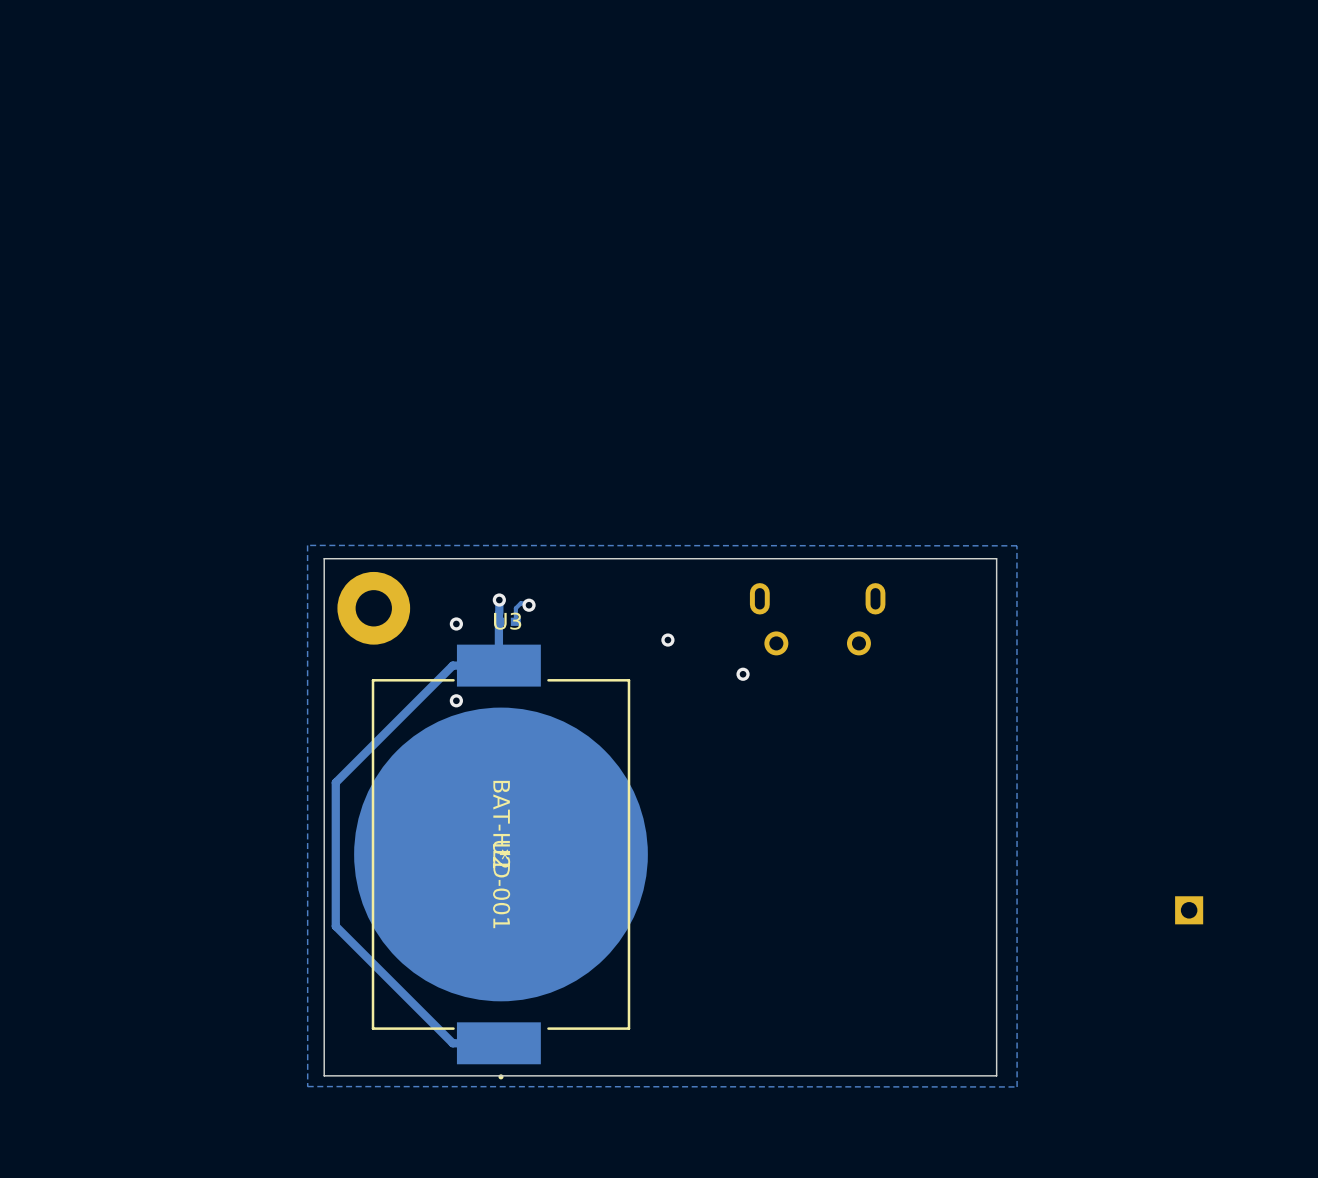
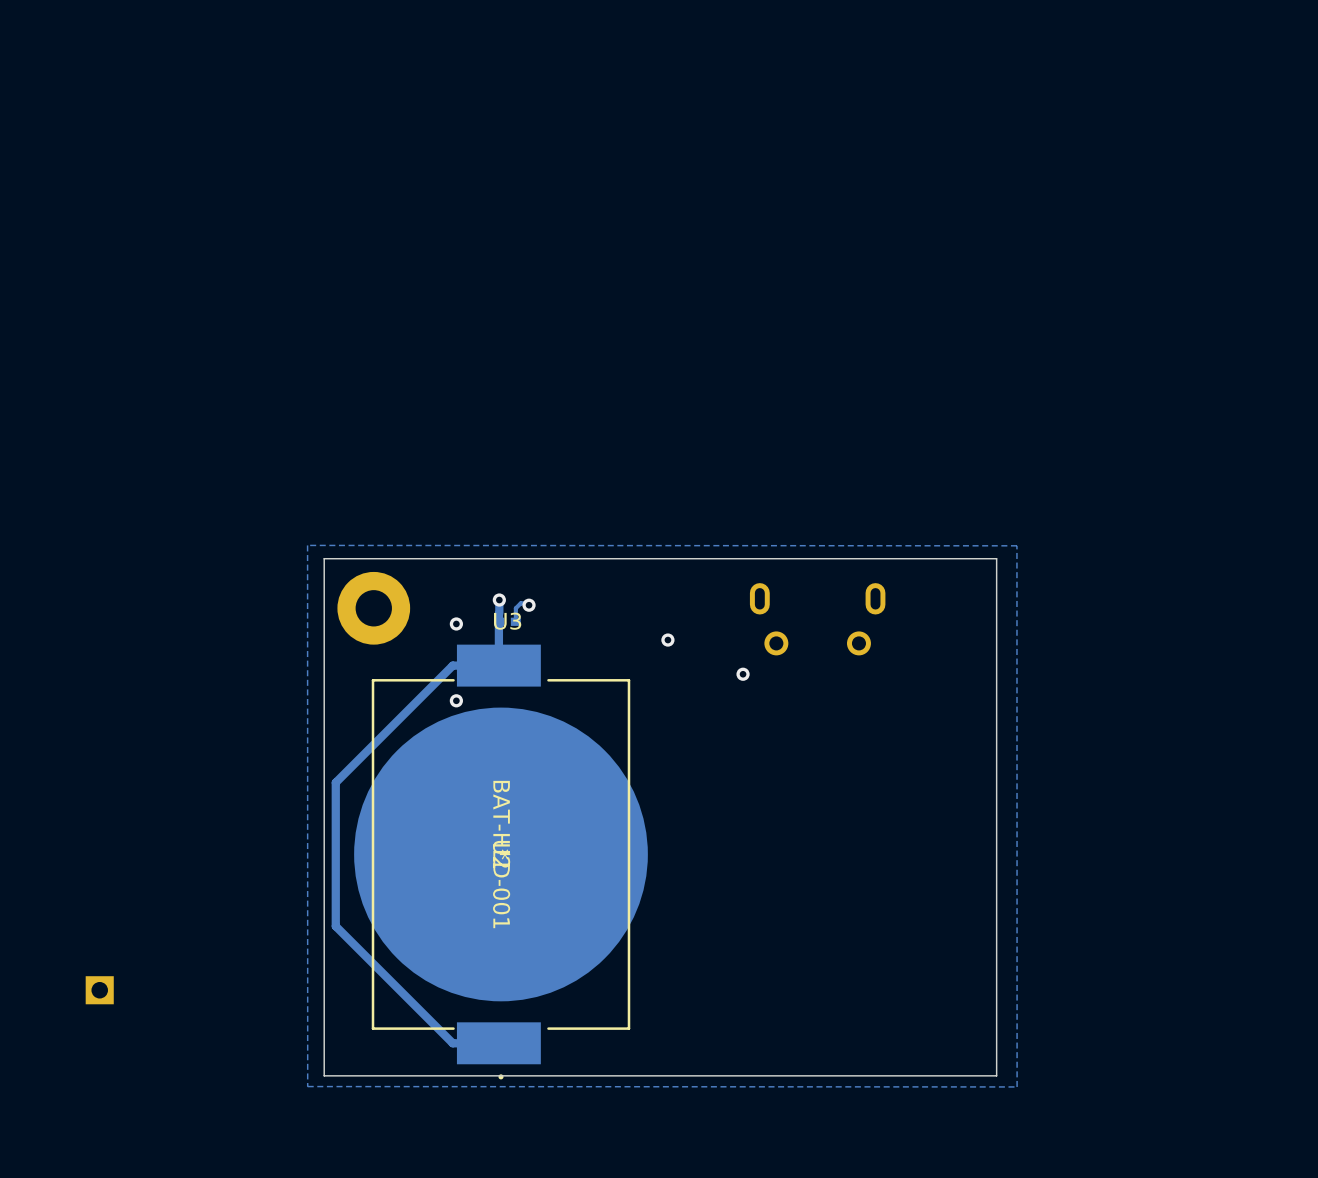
part: (1189, 910) -> none
part: none -> (99, 990)

